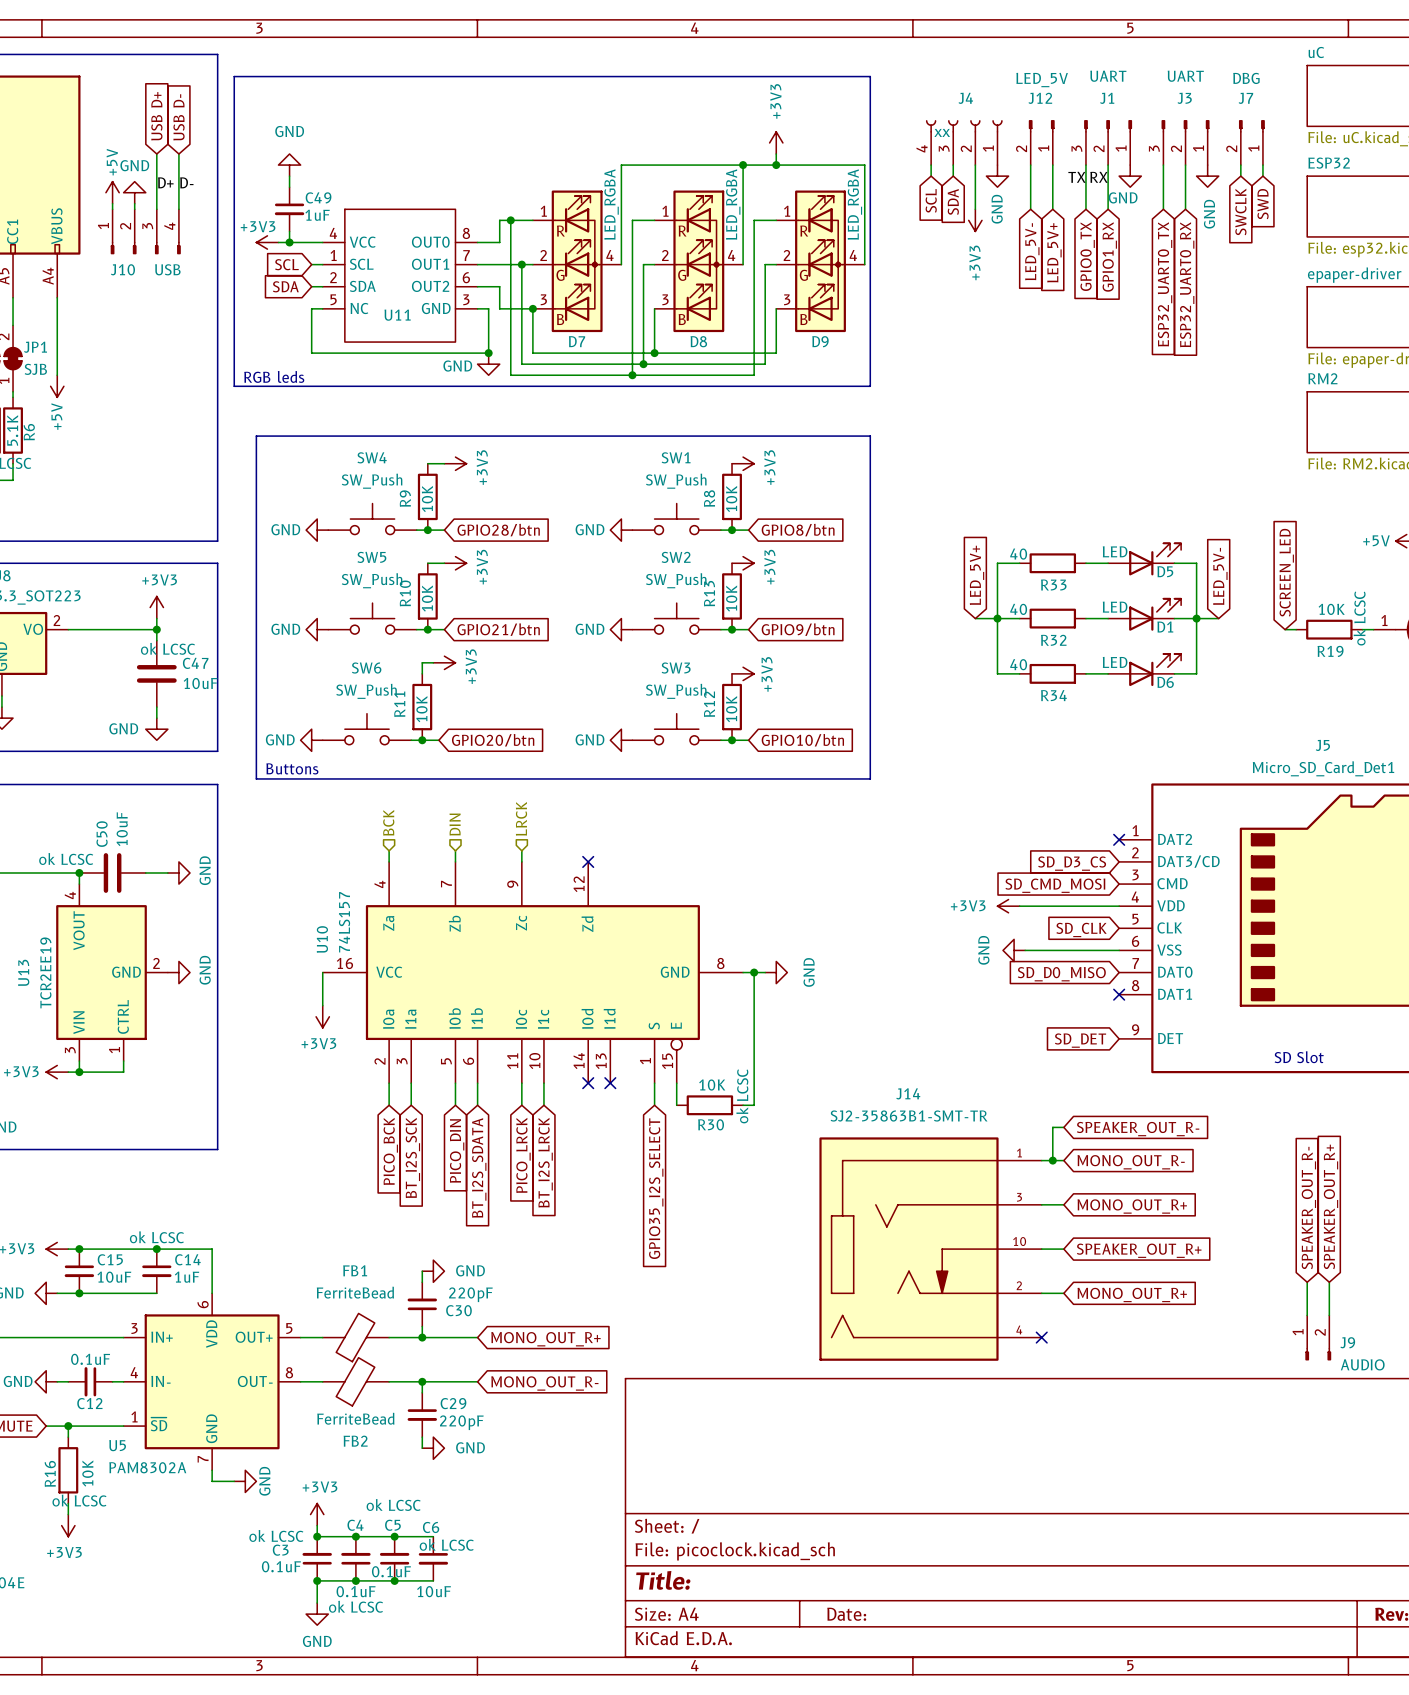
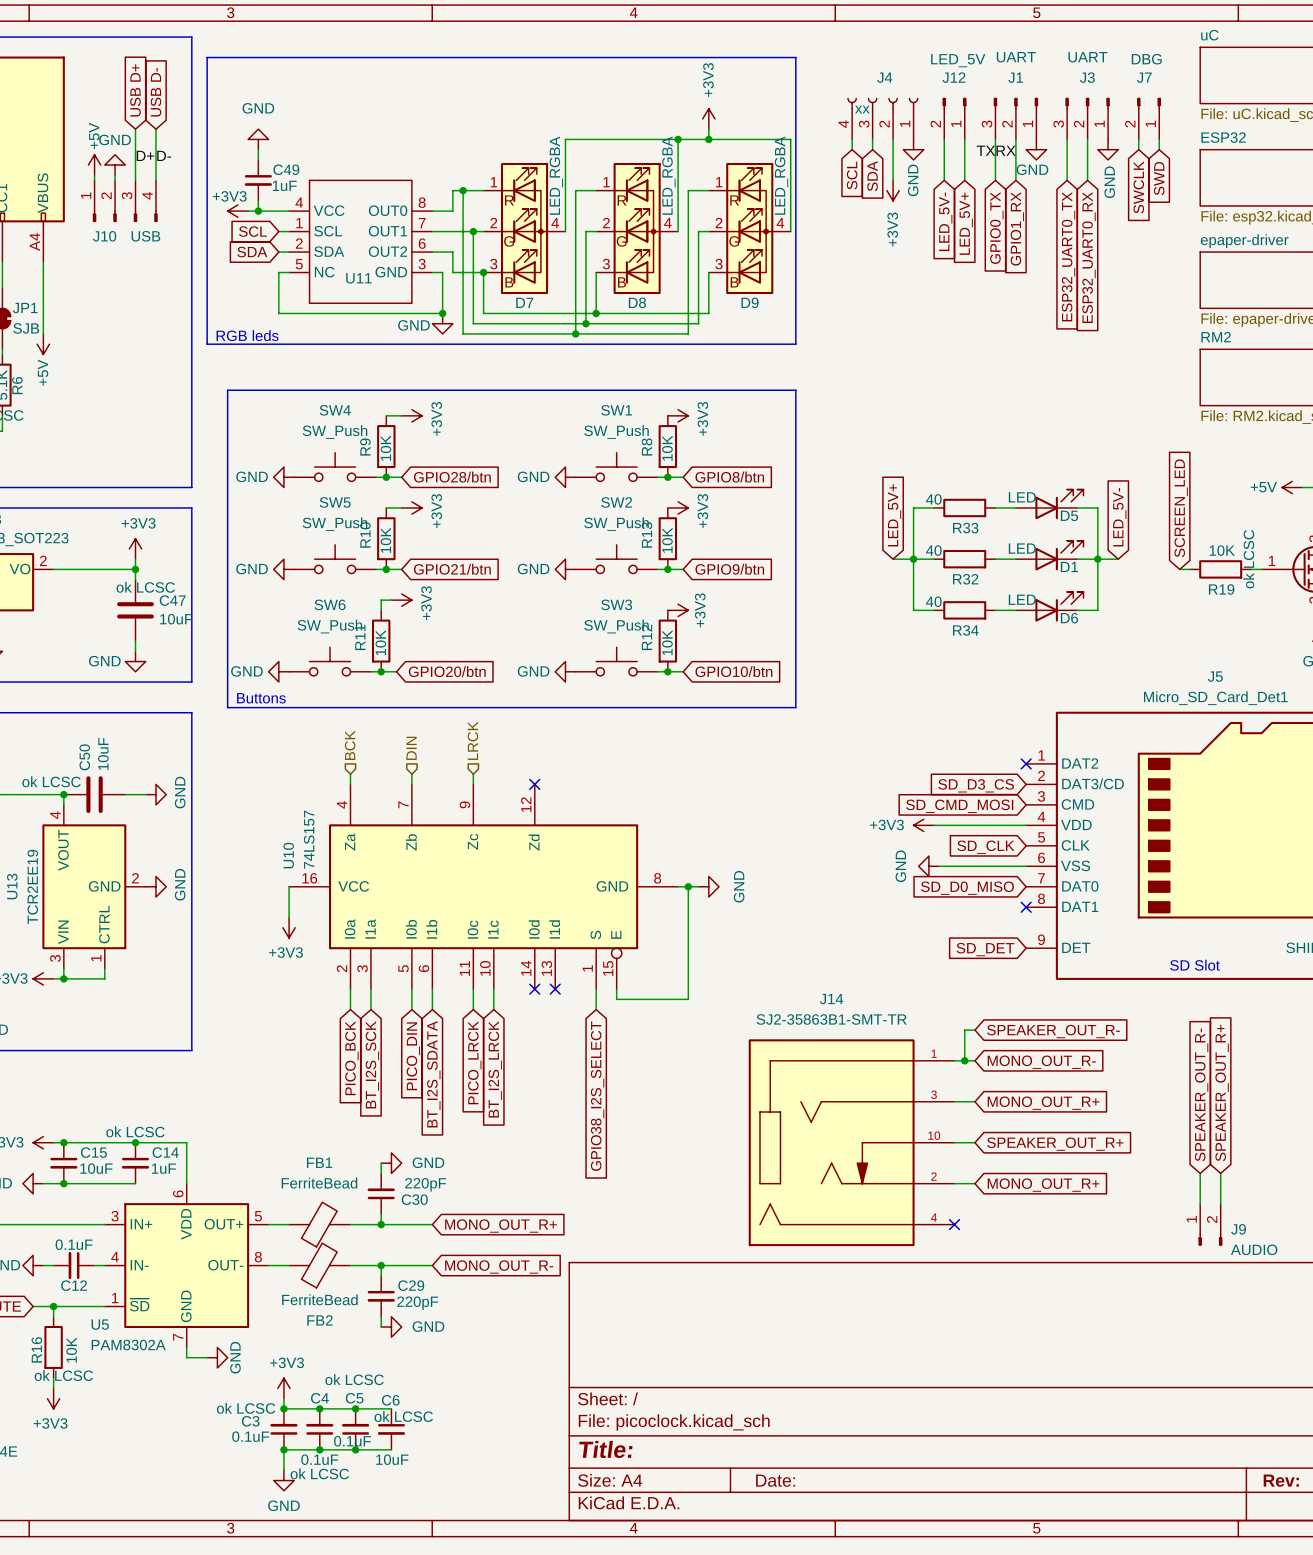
wire: (676, 1094) (676, 1105) -> none
wire: (754, 1094) (754, 1105) (743, 1105) -> (688, 999) (616, 999)
R30: 10K (709, 1105) -> none
global label: GPIO35_I2S_SELECT (656, 1188) -> GPIO38_I2S_SELECT (597, 1096)

